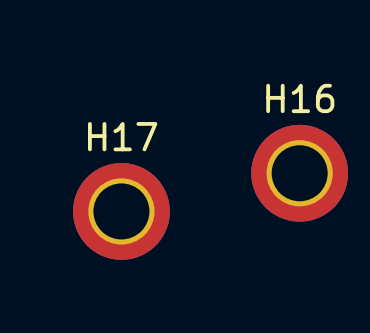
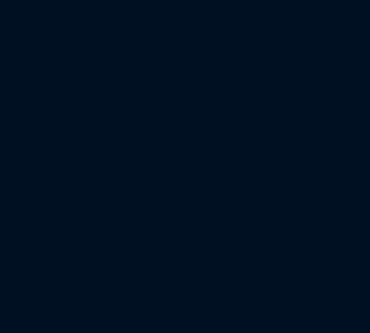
H16: (299, 173) -> none
H17: (121, 211) -> none

